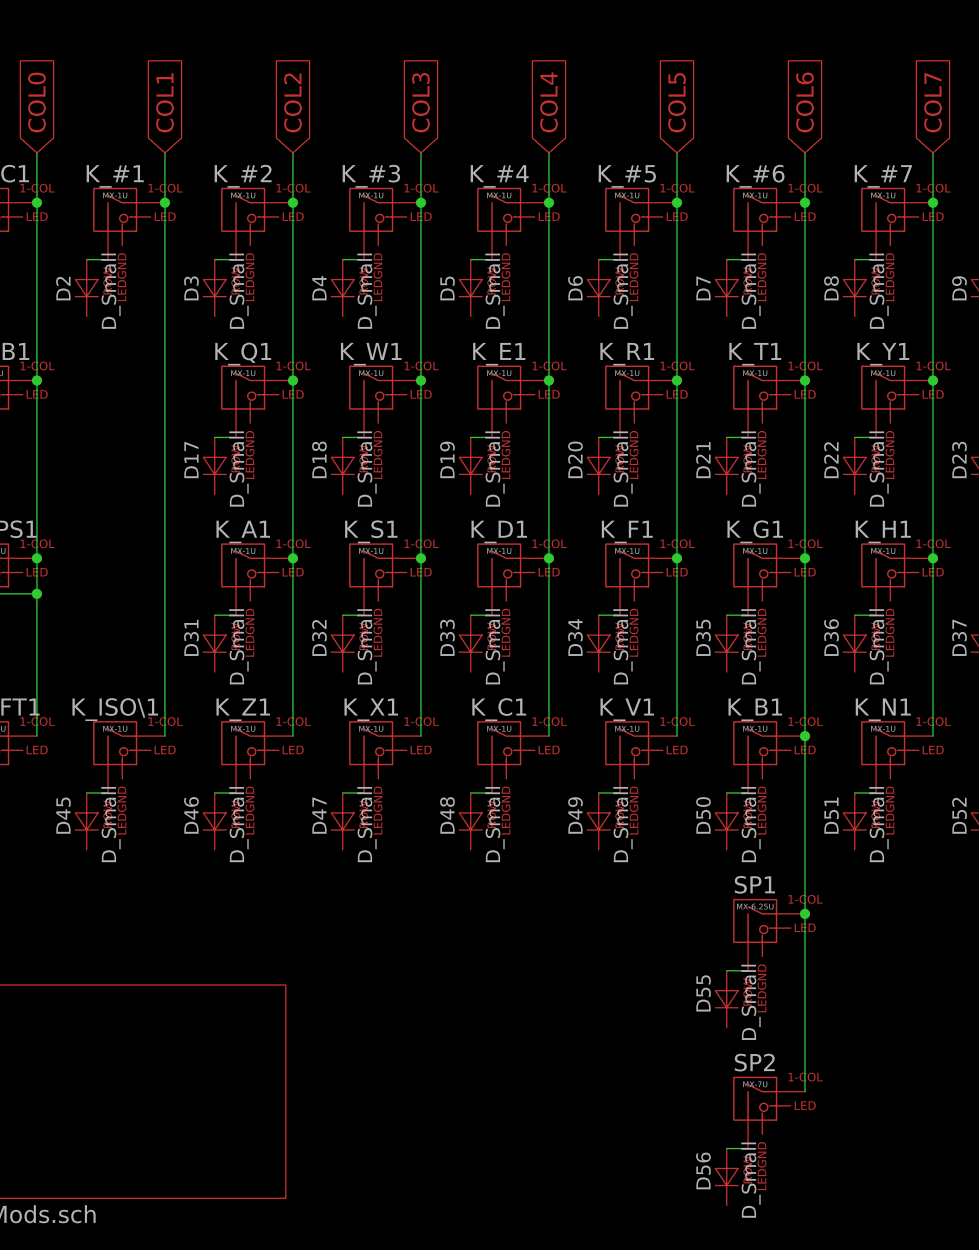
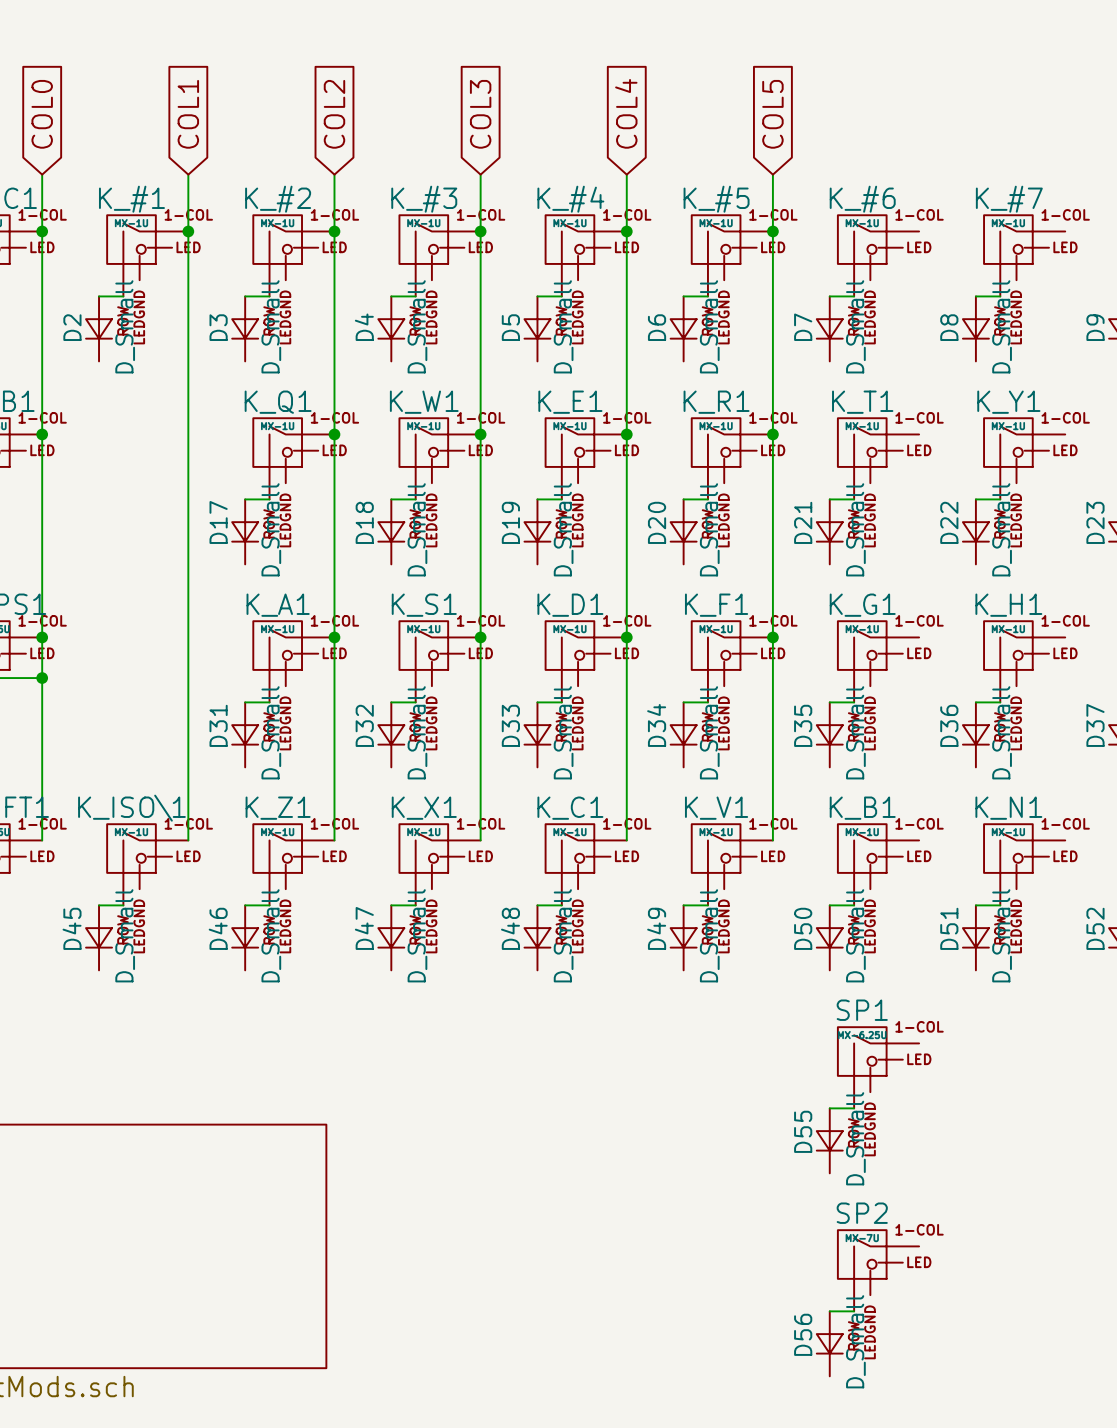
global label: COL6 (804, 102) -> none
global label: COL7 (932, 102) -> none
wire: (804, 152) (804, 1091) -> none
wire: (932, 152) (932, 736) -> none
junction: (804, 202) -> none
junction: (932, 202) -> none
junction: (804, 380) -> none
junction: (932, 380) -> none
junction: (804, 558) -> none
junction: (932, 558) -> none
junction: (804, 736) -> none
junction: (804, 913) -> none

